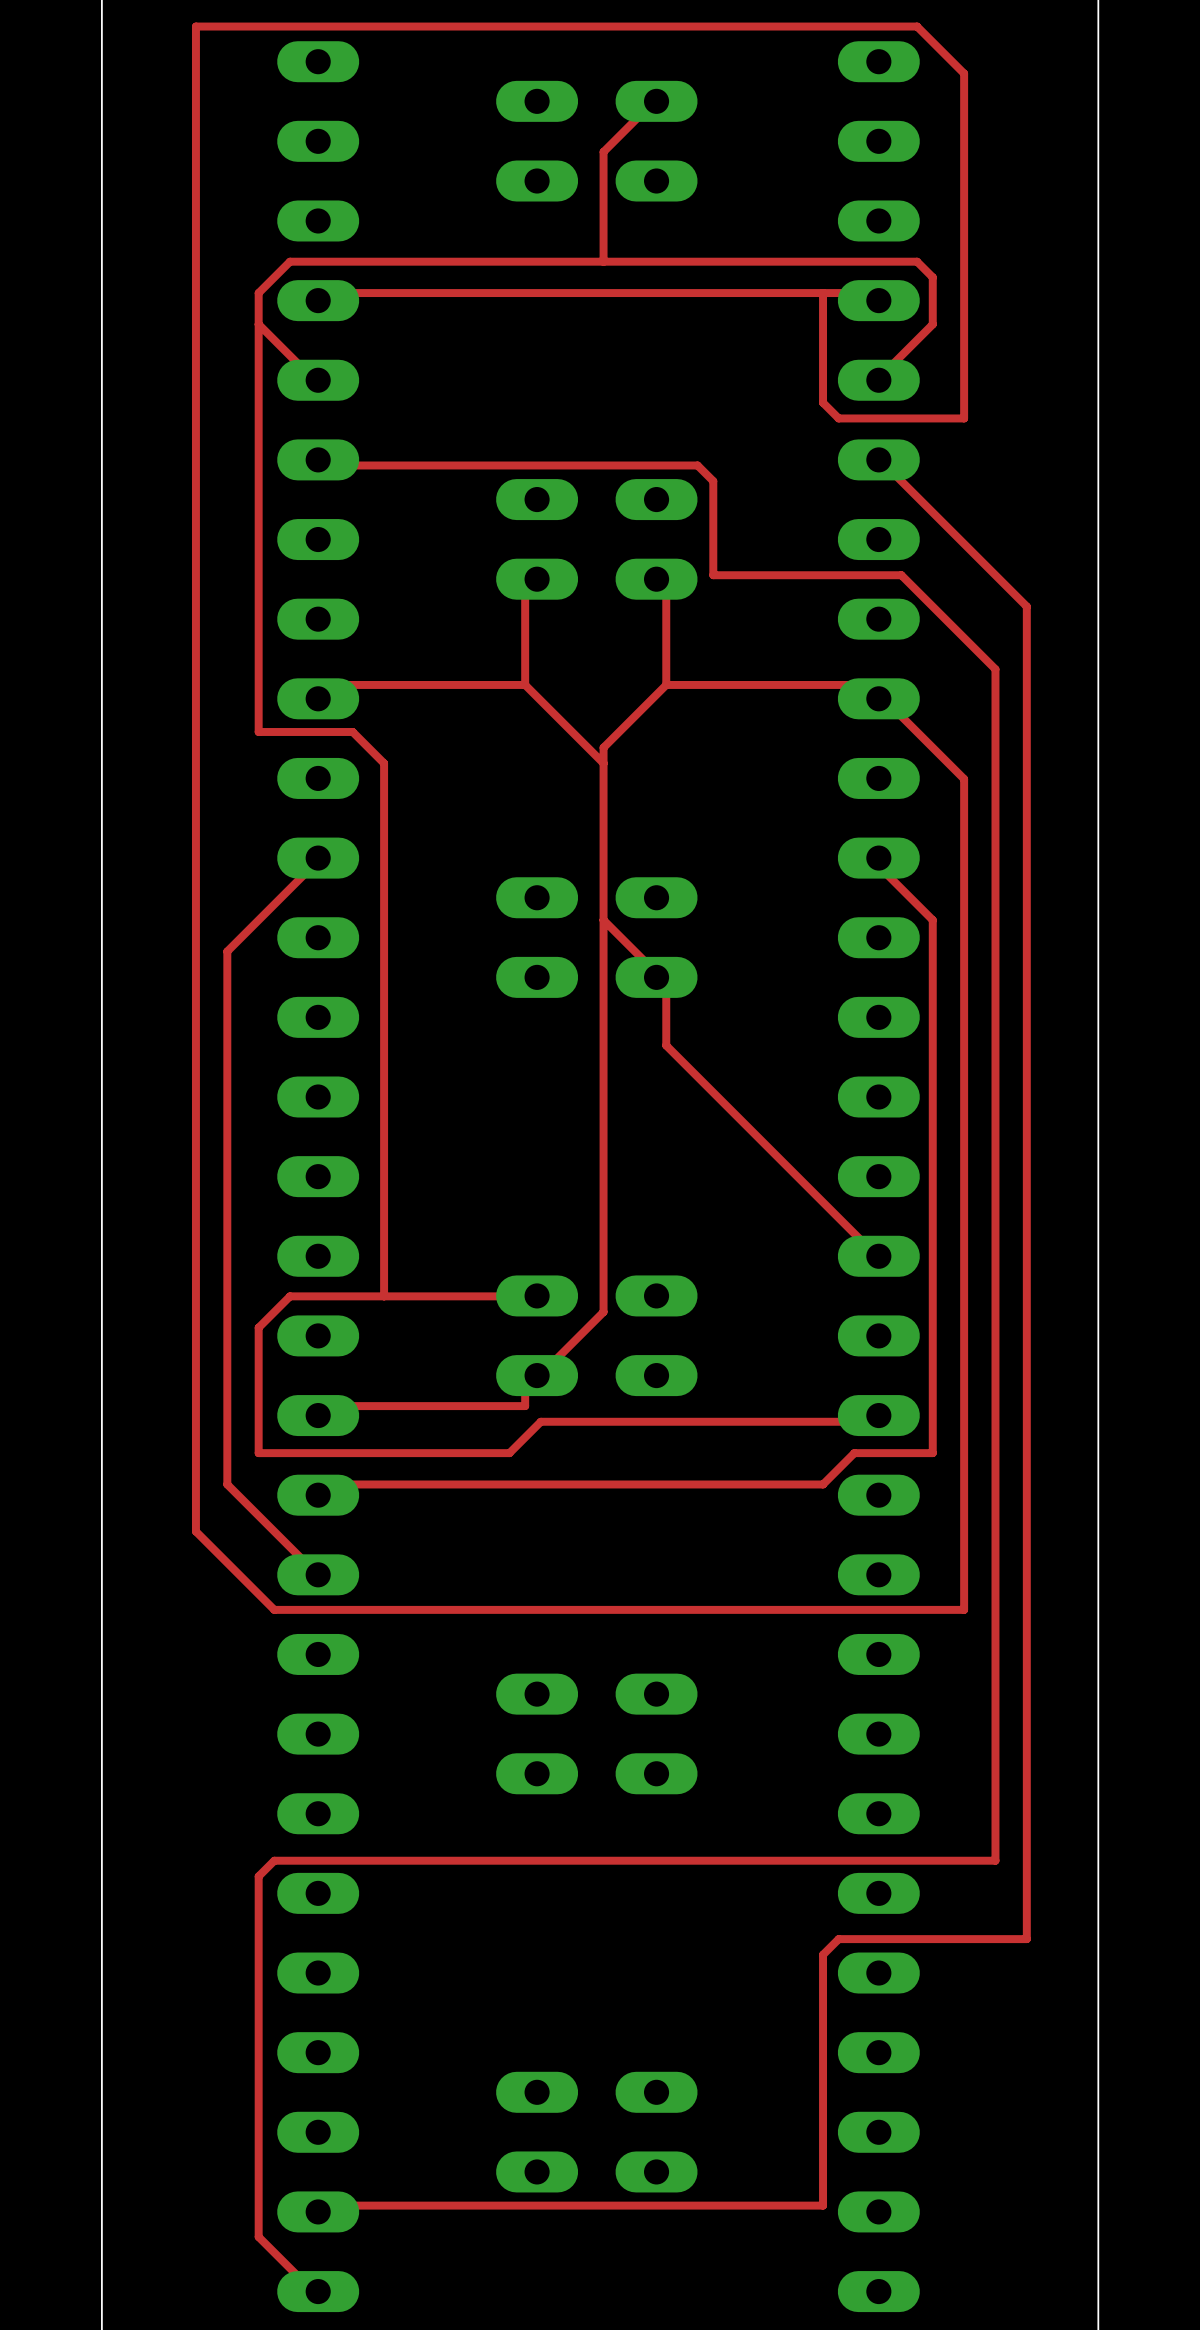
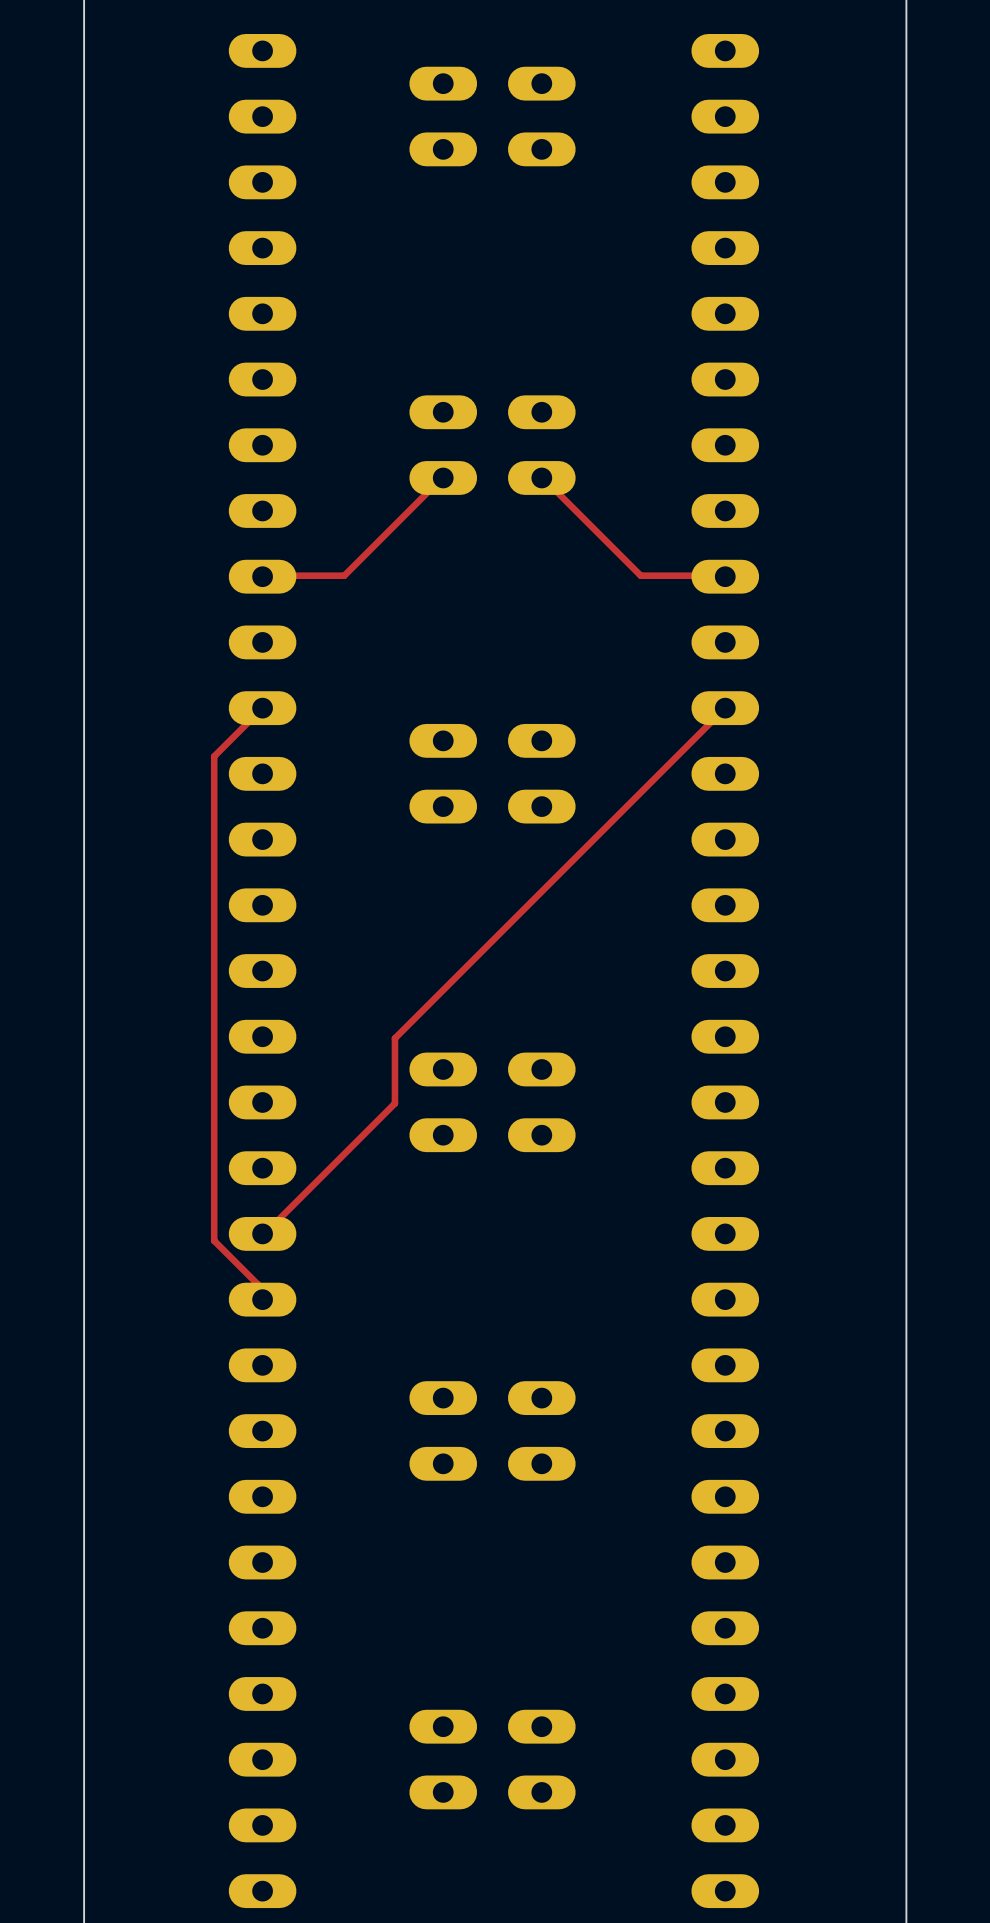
top track: (656, 101) (650, 104) (603, 151) (603, 261) -> none
top track: (823, 293) (823, 402) (838, 418) (964, 418) (964, 73) (917, 26) (195, 26) (195, 1531) (274, 1609) (964, 1609) (964, 779) (885, 700) (878, 698) (870, 684) (666, 684) -> none
top track: (318, 300) (321, 293) (870, 293) (878, 300) -> none
top track: (258, 324) (305, 371) (318, 380) -> none
top track: (878, 380) (932, 324) (932, 277) (917, 261) (290, 261) (258, 293) (258, 731) (352, 731) (384, 763) (384, 1296) -> none
top track: (318, 459) (321, 465) (697, 465) (713, 481) (713, 575) (901, 575) (995, 669) (995, 1860) (274, 1860) (258, 1876) (258, 2236) (305, 2283) (318, 2291) -> none
top track: (878, 459) (1026, 606) (1026, 1939) (838, 1939) (823, 1954) (823, 2205) (321, 2205) (318, 2211) -> none
top track: (650, 575) (666, 590) (666, 684) -> none
top track: (537, 579) (525, 590) (525, 684) -> none
top track: none -> (541, 477) (640, 575) (725, 576)
top track: (525, 684) (321, 684) (318, 698) -> (443, 477) (344, 575) (262, 576)
top track: (525, 684) (603, 763) -> none
top track: (666, 684) (603, 747) (603, 1312) (540, 1374) (537, 1375) (525, 1390) (525, 1406) (321, 1406) (318, 1415) -> none
top track: (318, 858) (305, 873) (227, 951) (227, 1484) (318, 1574) -> (262, 708) (214, 756) (214, 1240) (257, 1284) (257, 1298) (262, 1299)
top track: (878, 858) (885, 873) (932, 920) (932, 1453) (854, 1453) (823, 1484) (321, 1484) (318, 1495) -> (725, 708) (394, 1038) (394, 1103) (262, 1233)
top track: (603, 920) (650, 967) (656, 977) (666, 982) (666, 1045) (878, 1256) -> none
top track: (537, 1295) (290, 1296) (258, 1327) (258, 1453) (509, 1453) (540, 1421) (870, 1421) (878, 1415) -> none

